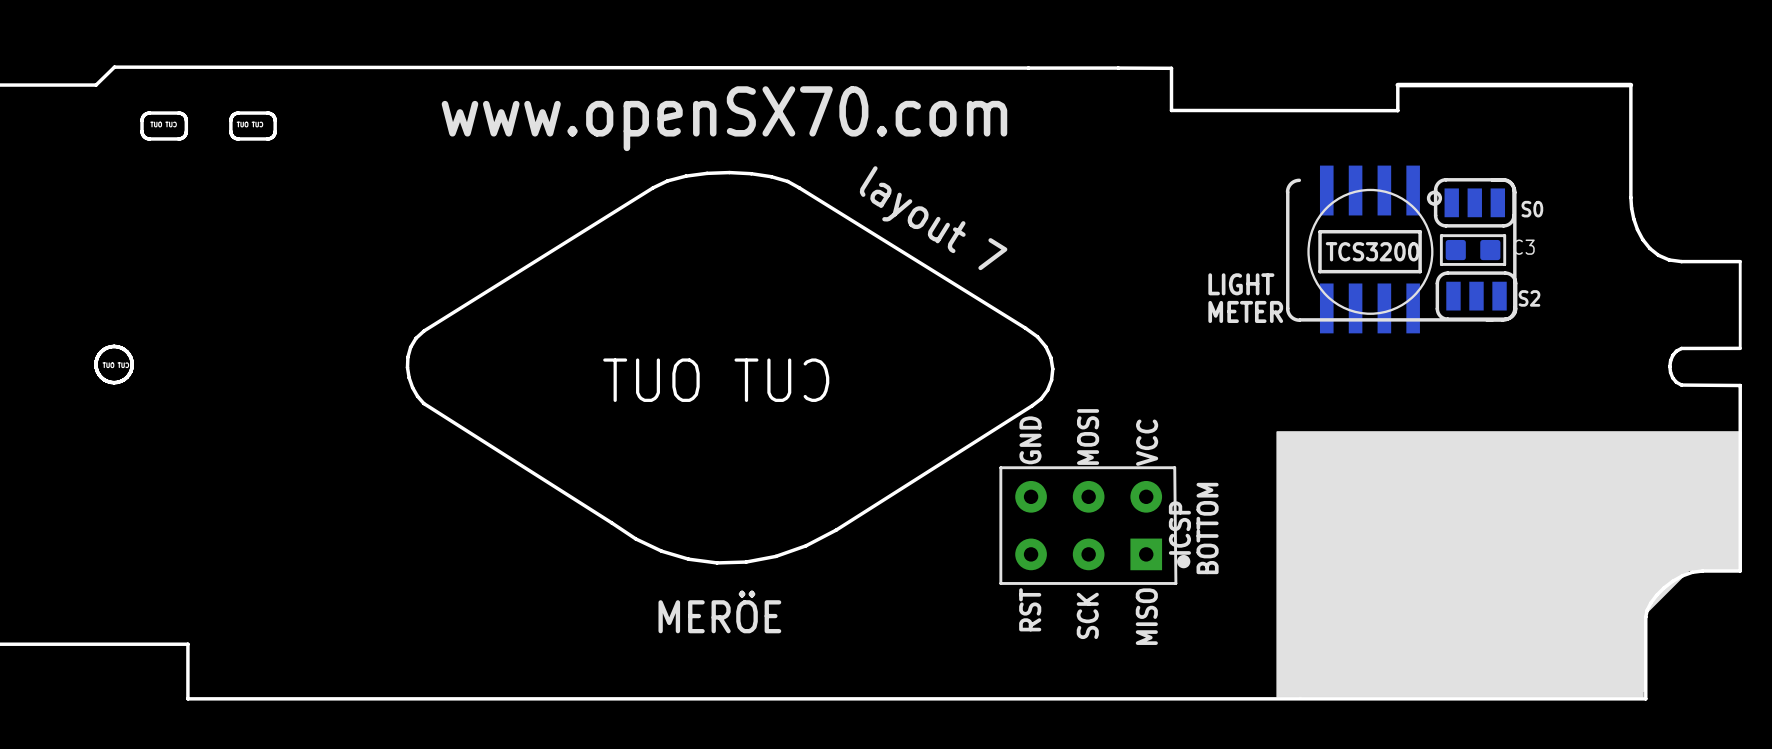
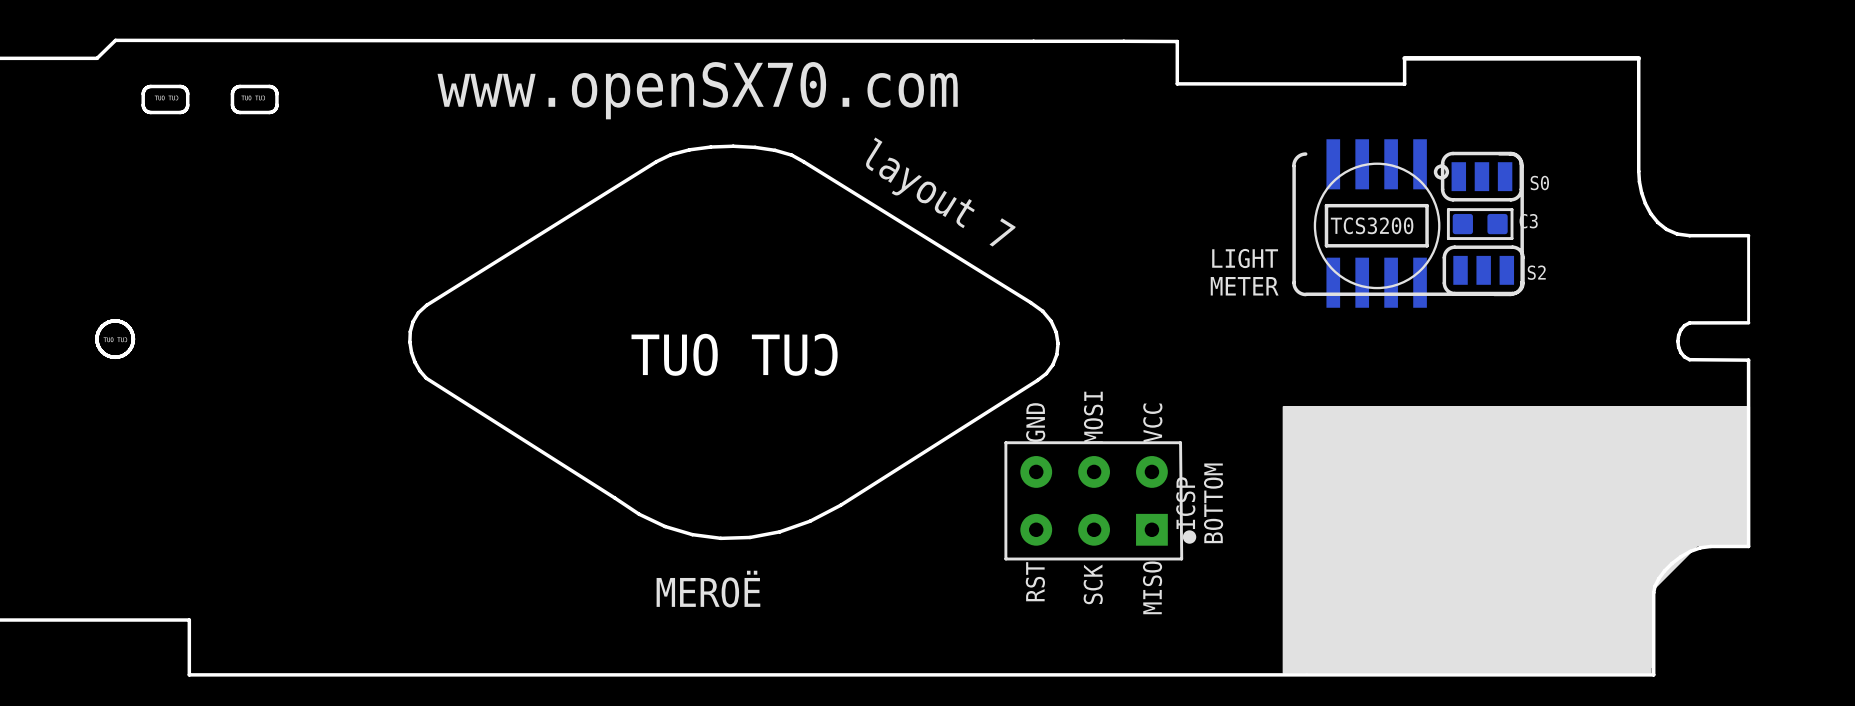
text: MERÖE (719, 611) -> MEROË (708, 589)

